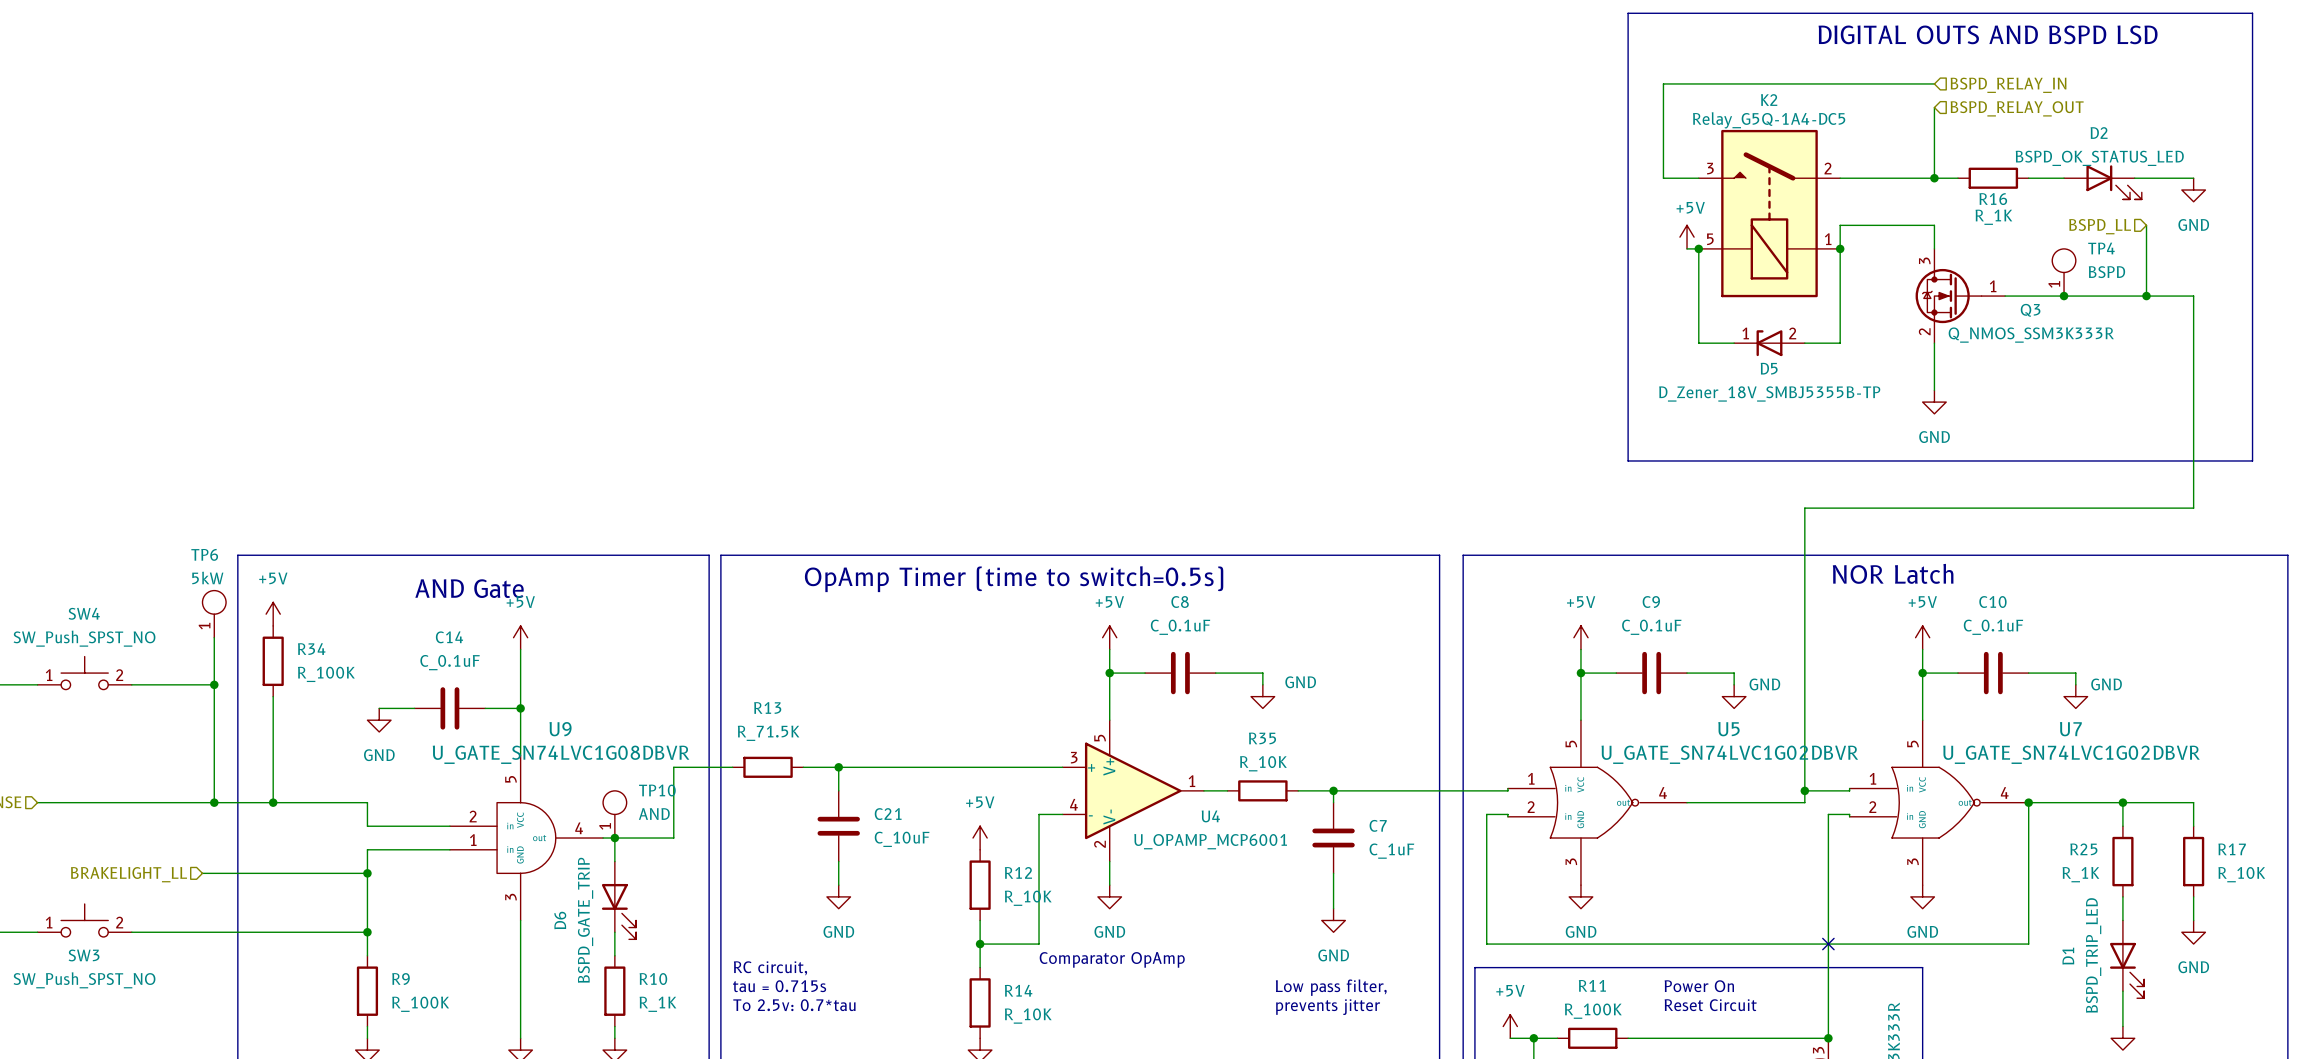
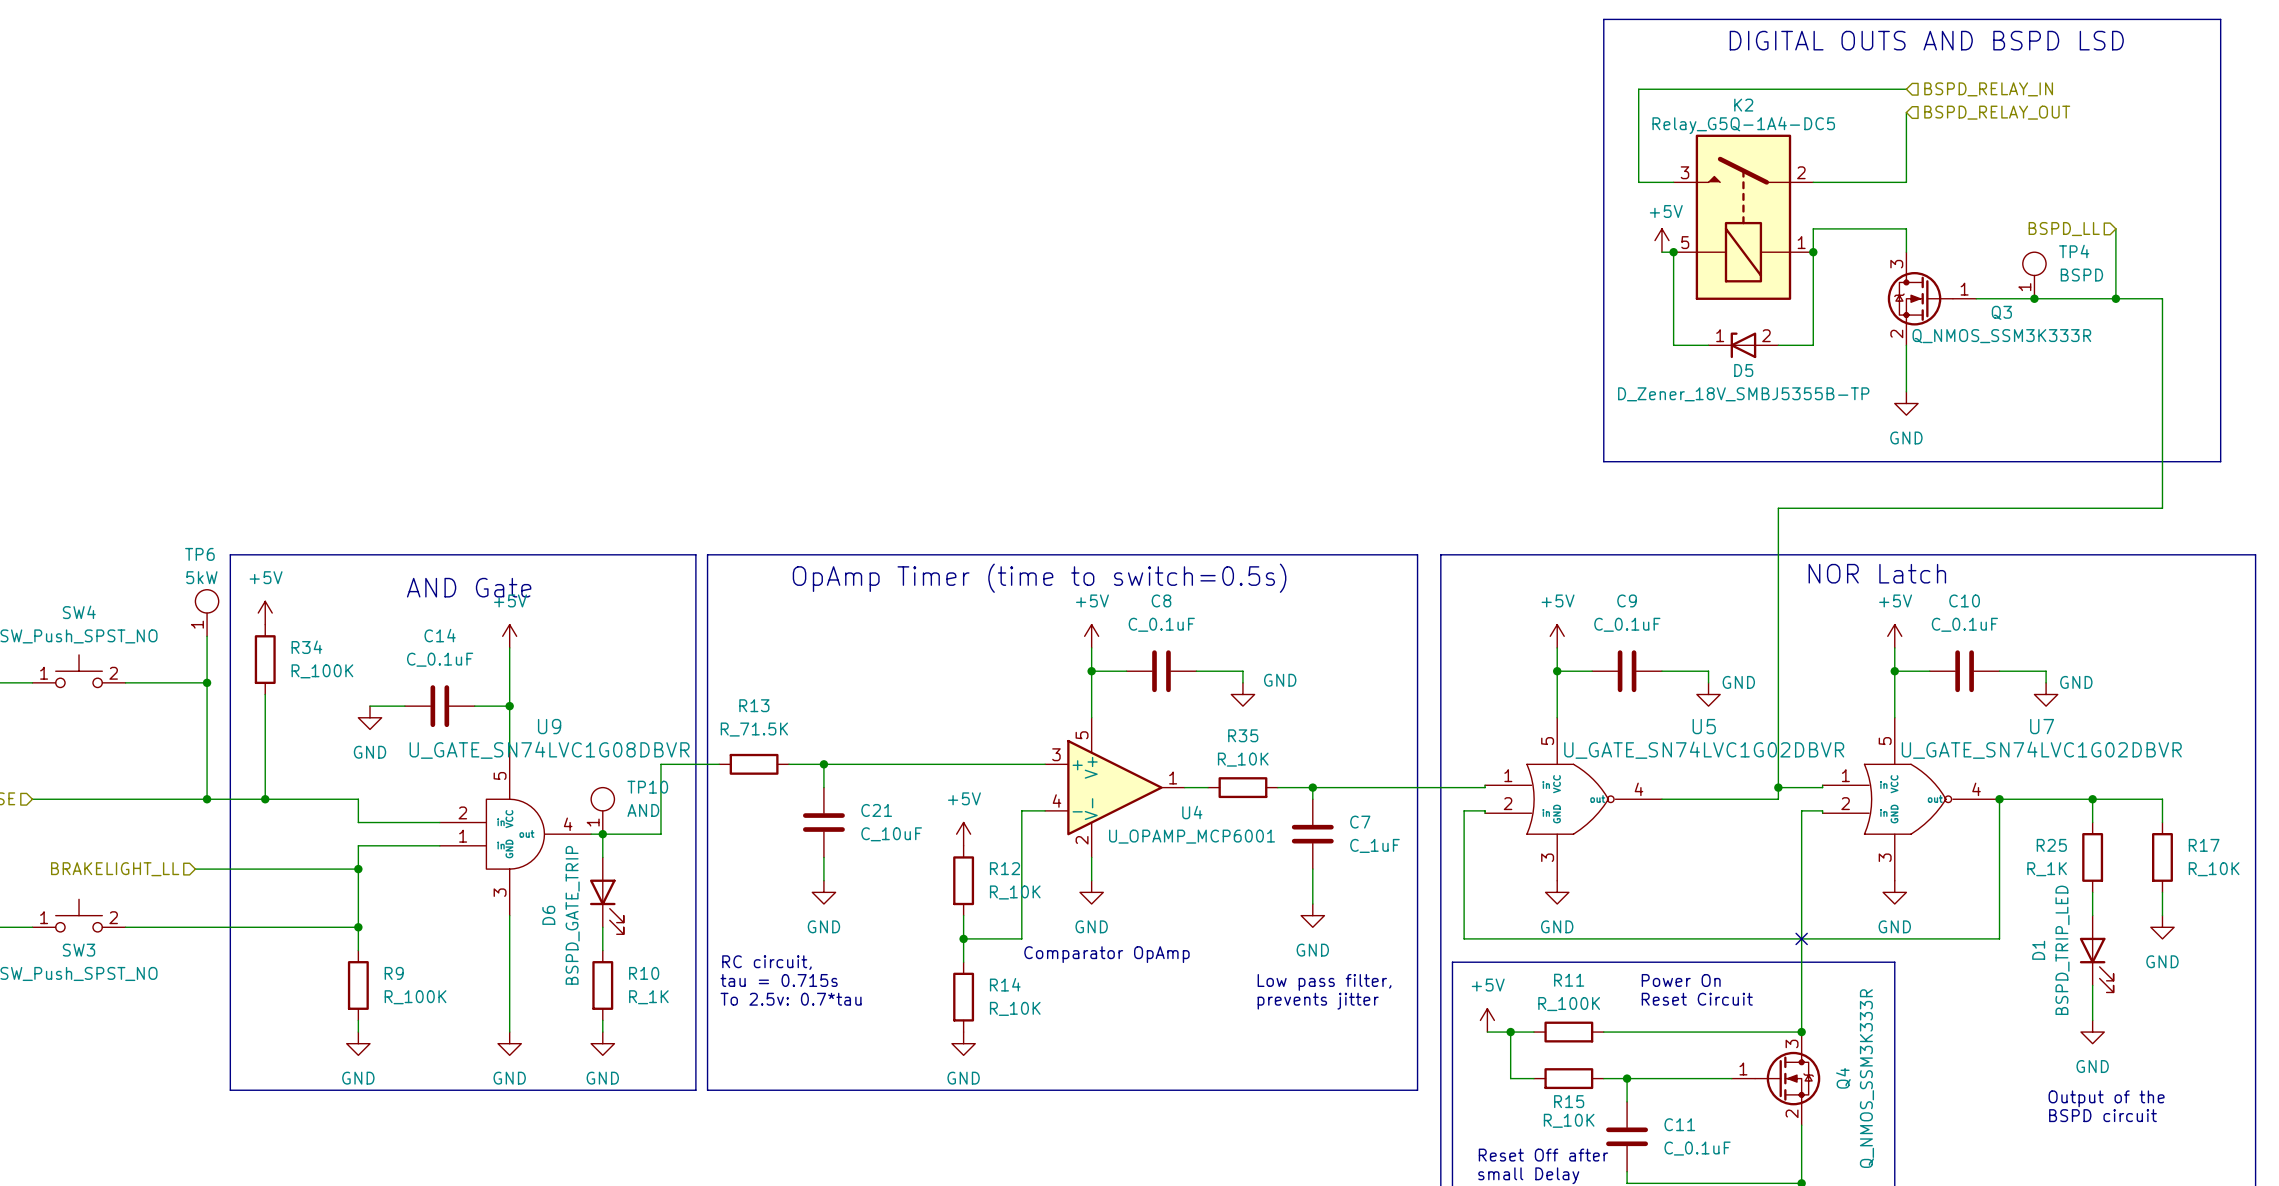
wire: (1934, 178) (1957, 178) -> none
junction: (1934, 178) -> none
R16: R_1K (1993, 178) -> none
wire: (2028, 178) (2064, 178) -> none
wire: (2134, 178) (2193, 178) -> none
D2: BSPD_OK_STATUS_LED (2102, 182) -> none
power symbol: GND (2193, 190) -> none

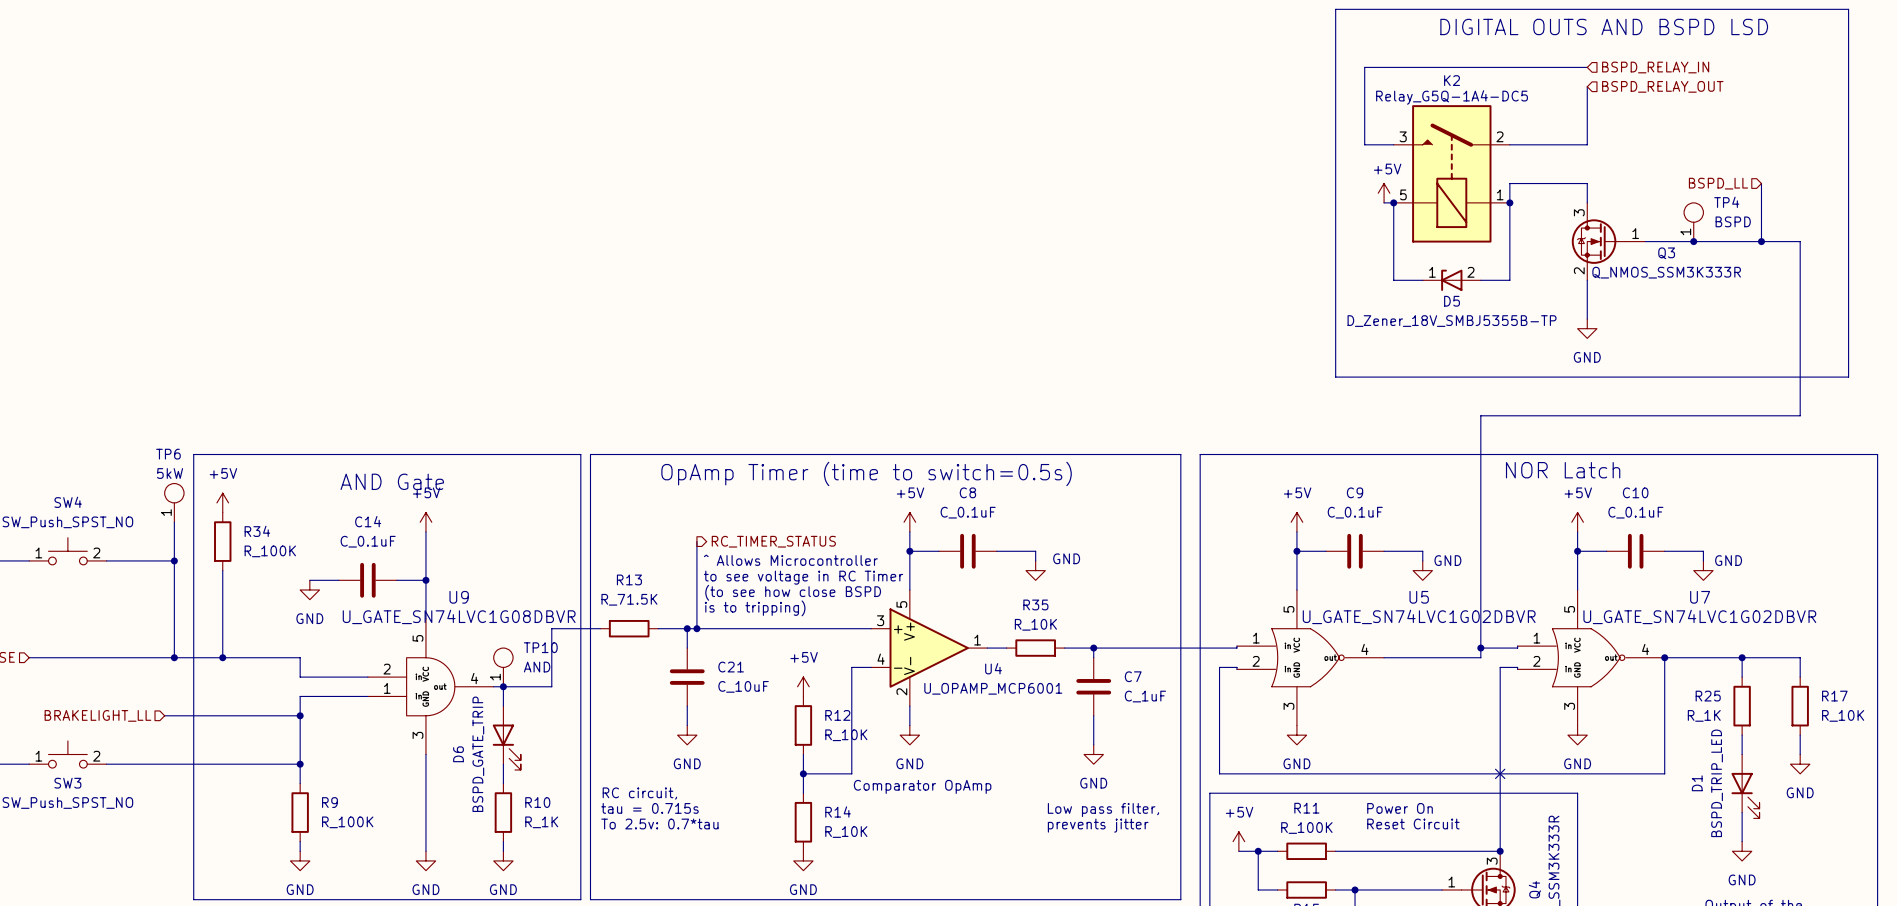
wire: none -> (696, 541) (696, 628)
hierarchical label: none -> RC_TIMER_STATUS (773, 541)
text: none -> ^ Allows Microcontroller (790, 560)
text: none -> to see voltage in RC Timer (803, 577)
text: none -> (to see how close BSPD (793, 592)
text: none -> is to tripping) (755, 608)
junction: none -> (696, 628)

